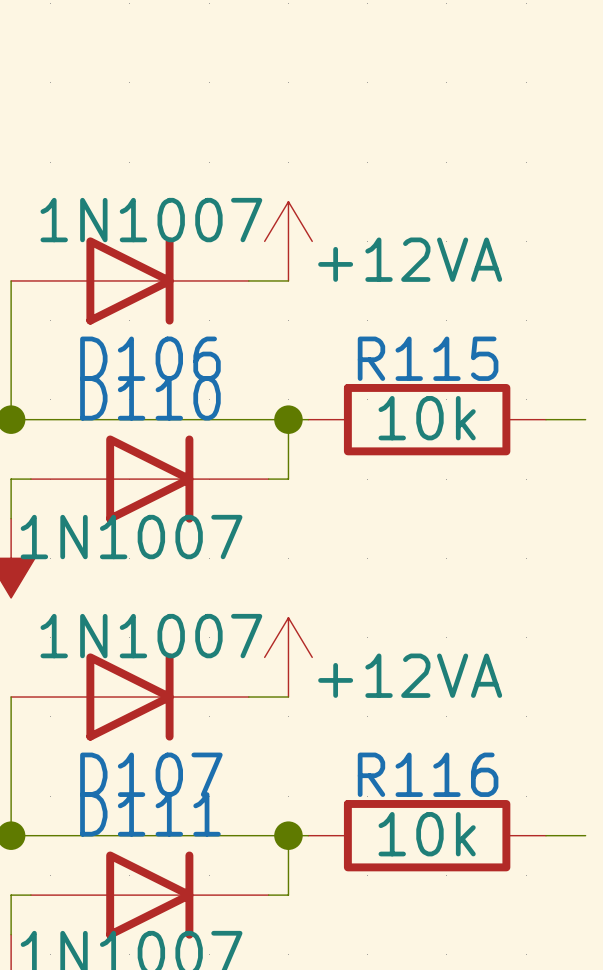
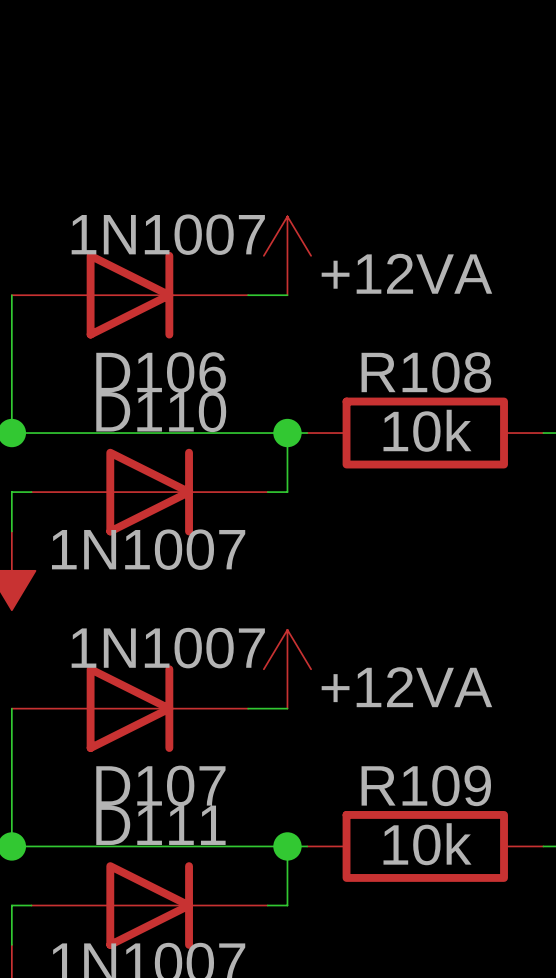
R115 name: R115 (428, 358) -> R108 (426, 372)
R116 name: R116 (428, 774) -> R109 (426, 785)

